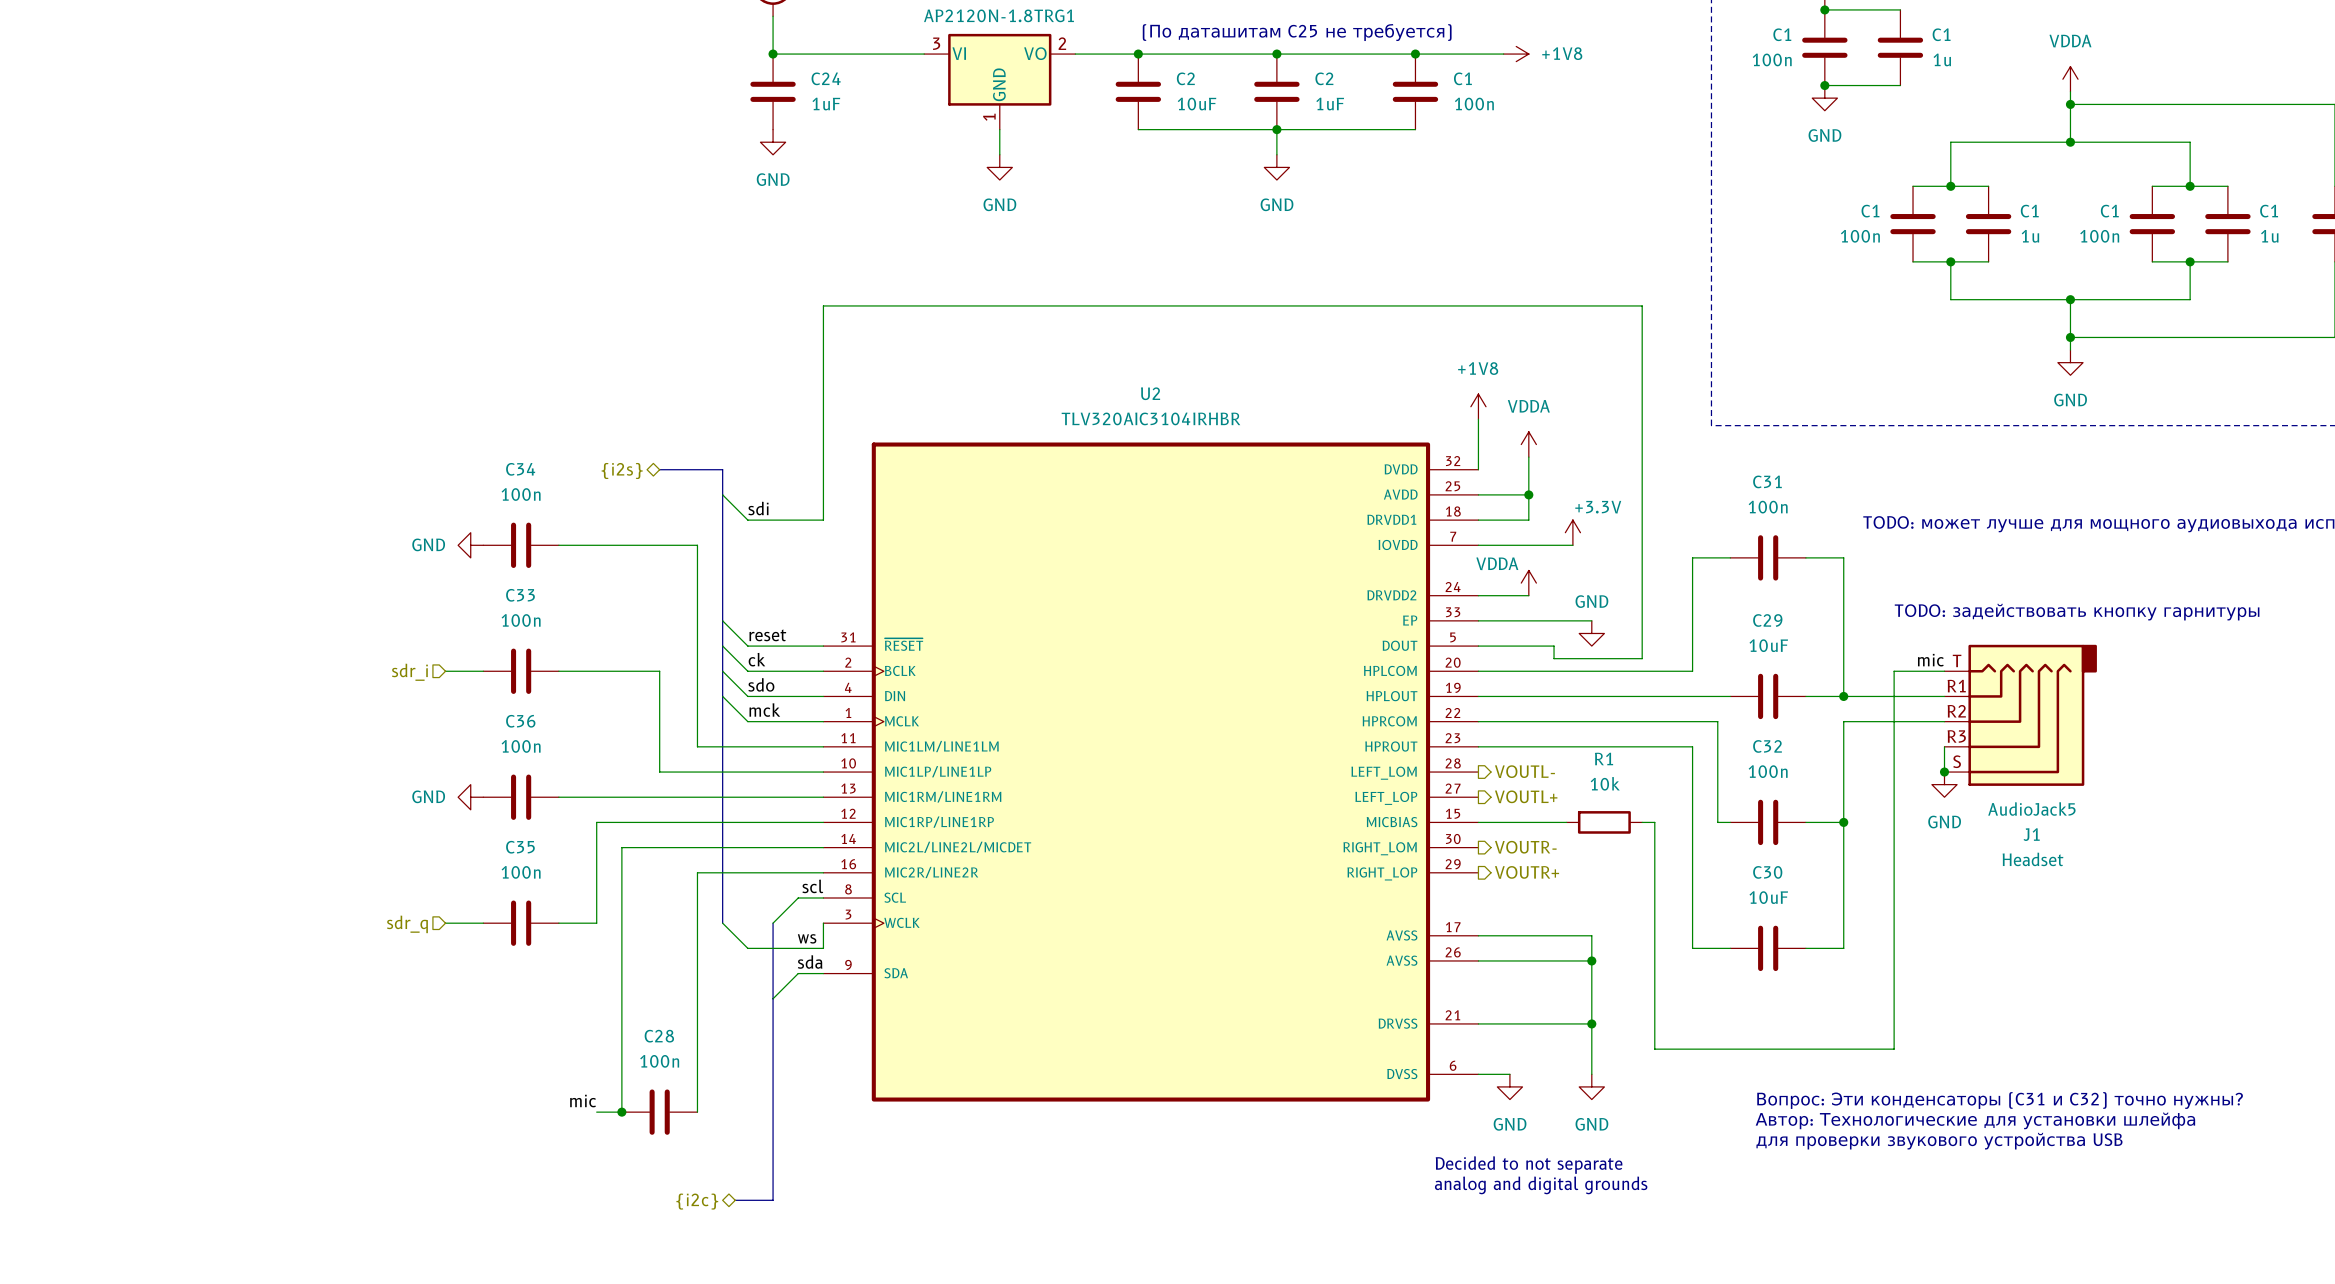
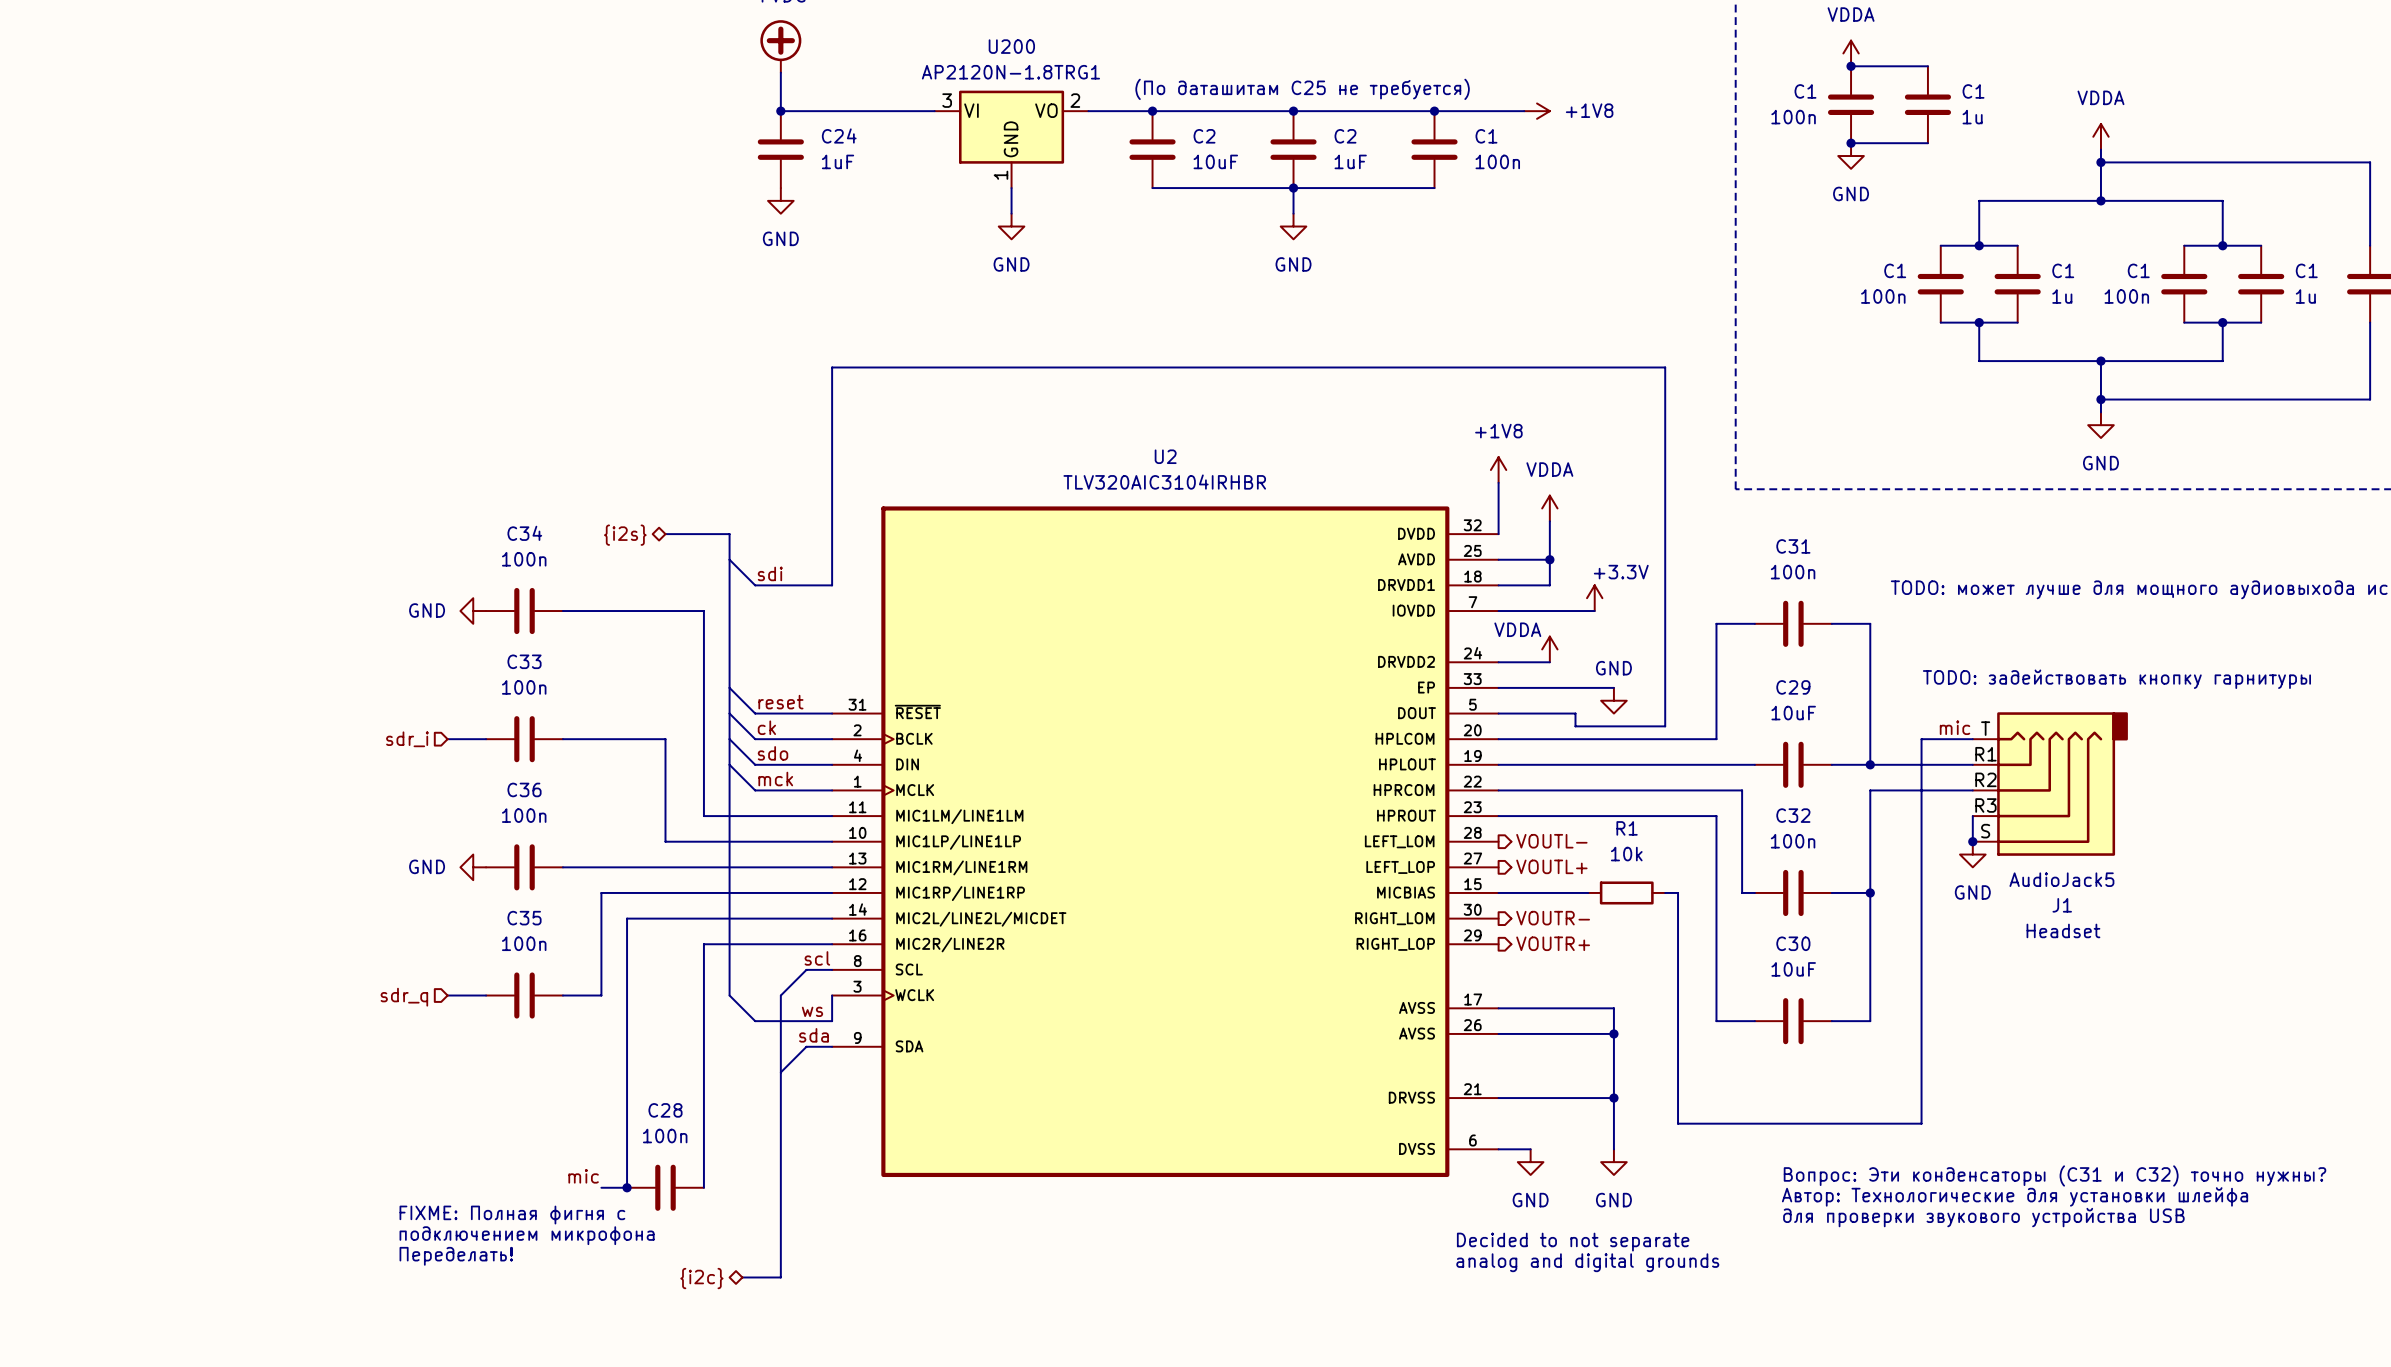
text: none -> FIXME: Полная фигня с (512, 1215)
text: none -> подключением микрофона (527, 1235)
text: none -> Переделать! (456, 1256)

